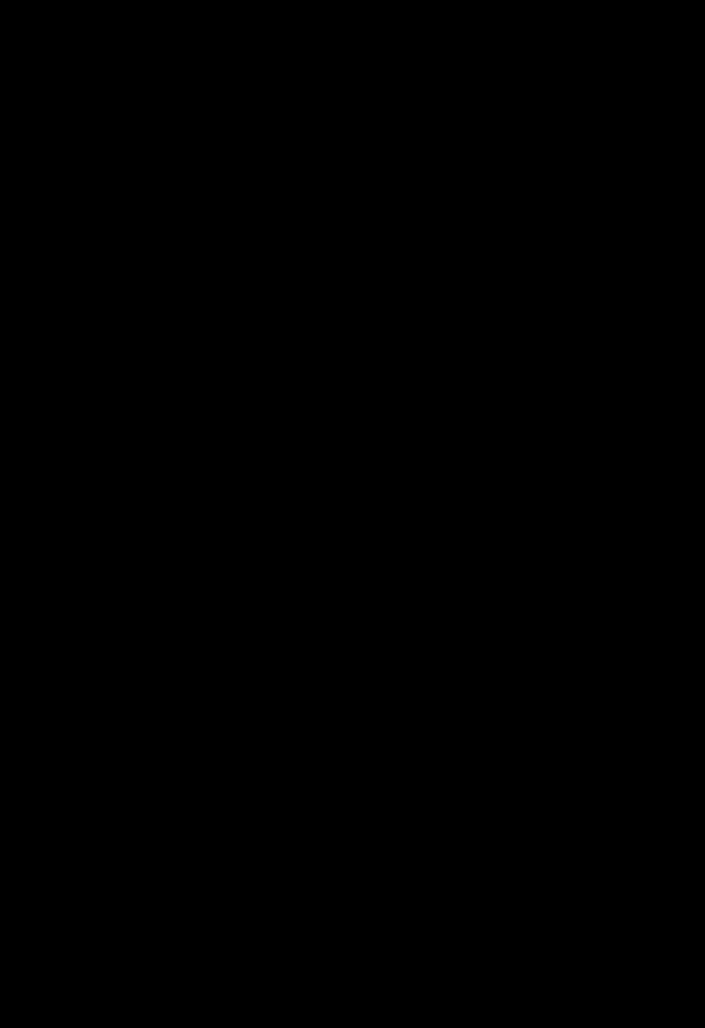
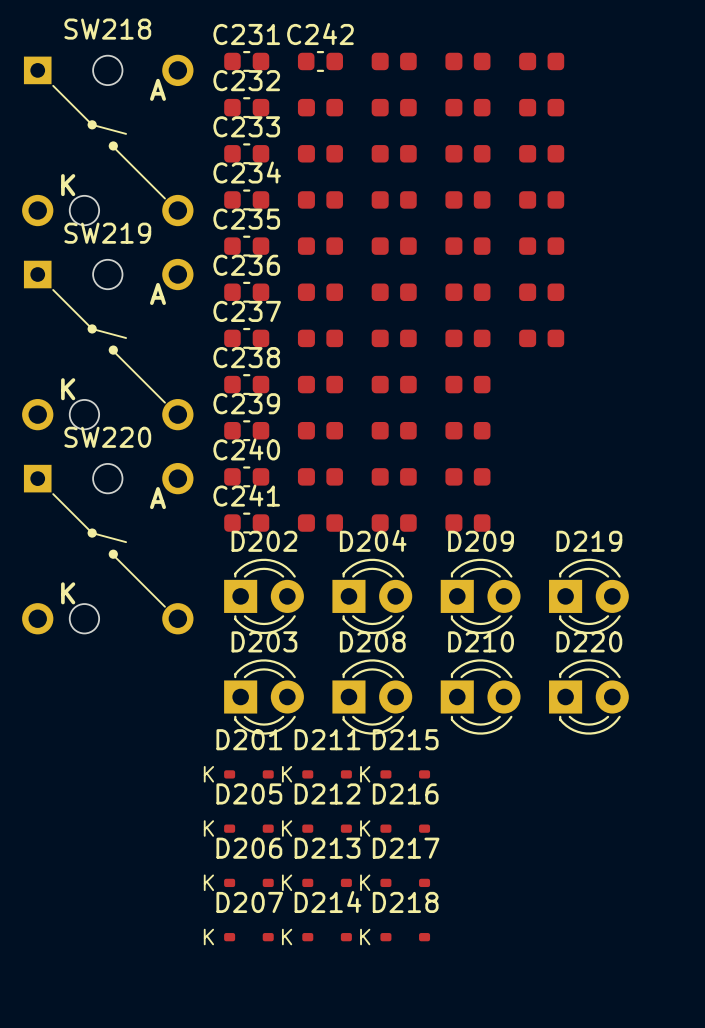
C231: none -> (246, 61)
C242: none -> (320, 61)
part: none -> (394, 61)
part: none -> (467, 61)
part: none -> (541, 61)
C232: none -> (246, 107)
part: none -> (320, 107)
part: none -> (394, 107)
part: none -> (467, 107)
part: none -> (541, 107)
SW218: none -> (107, 140)
C233: none -> (246, 153)
part: none -> (320, 153)
part: none -> (394, 153)
part: none -> (467, 153)
part: none -> (541, 153)
C234: none -> (246, 199)
part: none -> (320, 199)
part: none -> (394, 199)
part: none -> (467, 199)
part: none -> (541, 199)
C235: none -> (246, 246)
part: none -> (320, 246)
part: none -> (394, 246)
part: none -> (467, 246)
part: none -> (541, 246)
C236: none -> (246, 292)
part: none -> (320, 292)
part: none -> (394, 292)
part: none -> (467, 292)
part: none -> (541, 292)
C237: none -> (246, 338)
part: none -> (320, 338)
part: none -> (394, 338)
part: none -> (467, 338)
part: none -> (541, 338)
SW219: none -> (107, 344)
C238: none -> (246, 384)
part: none -> (320, 384)
part: none -> (394, 384)
part: none -> (467, 384)
C239: none -> (246, 430)
part: none -> (320, 430)
part: none -> (394, 430)
part: none -> (467, 430)
C240: none -> (246, 476)
part: none -> (320, 476)
part: none -> (394, 476)
part: none -> (467, 476)
C241: none -> (246, 523)
part: none -> (320, 523)
part: none -> (394, 523)
part: none -> (467, 523)
SW220: none -> (107, 548)
D202: none -> (264, 596)
D204: none -> (372, 596)
D209: none -> (480, 596)
D219: none -> (588, 596)
D203: none -> (264, 696)
D208: none -> (372, 696)
D210: none -> (480, 696)
D220: none -> (588, 696)
D201: none -> (248, 774)
D211: none -> (327, 774)
D215: none -> (405, 774)
D205: none -> (248, 828)
D212: none -> (327, 828)
D216: none -> (405, 828)
D206: none -> (248, 882)
D213: none -> (327, 882)
D217: none -> (405, 882)
D207: none -> (248, 937)
D214: none -> (327, 937)
D218: none -> (405, 937)

